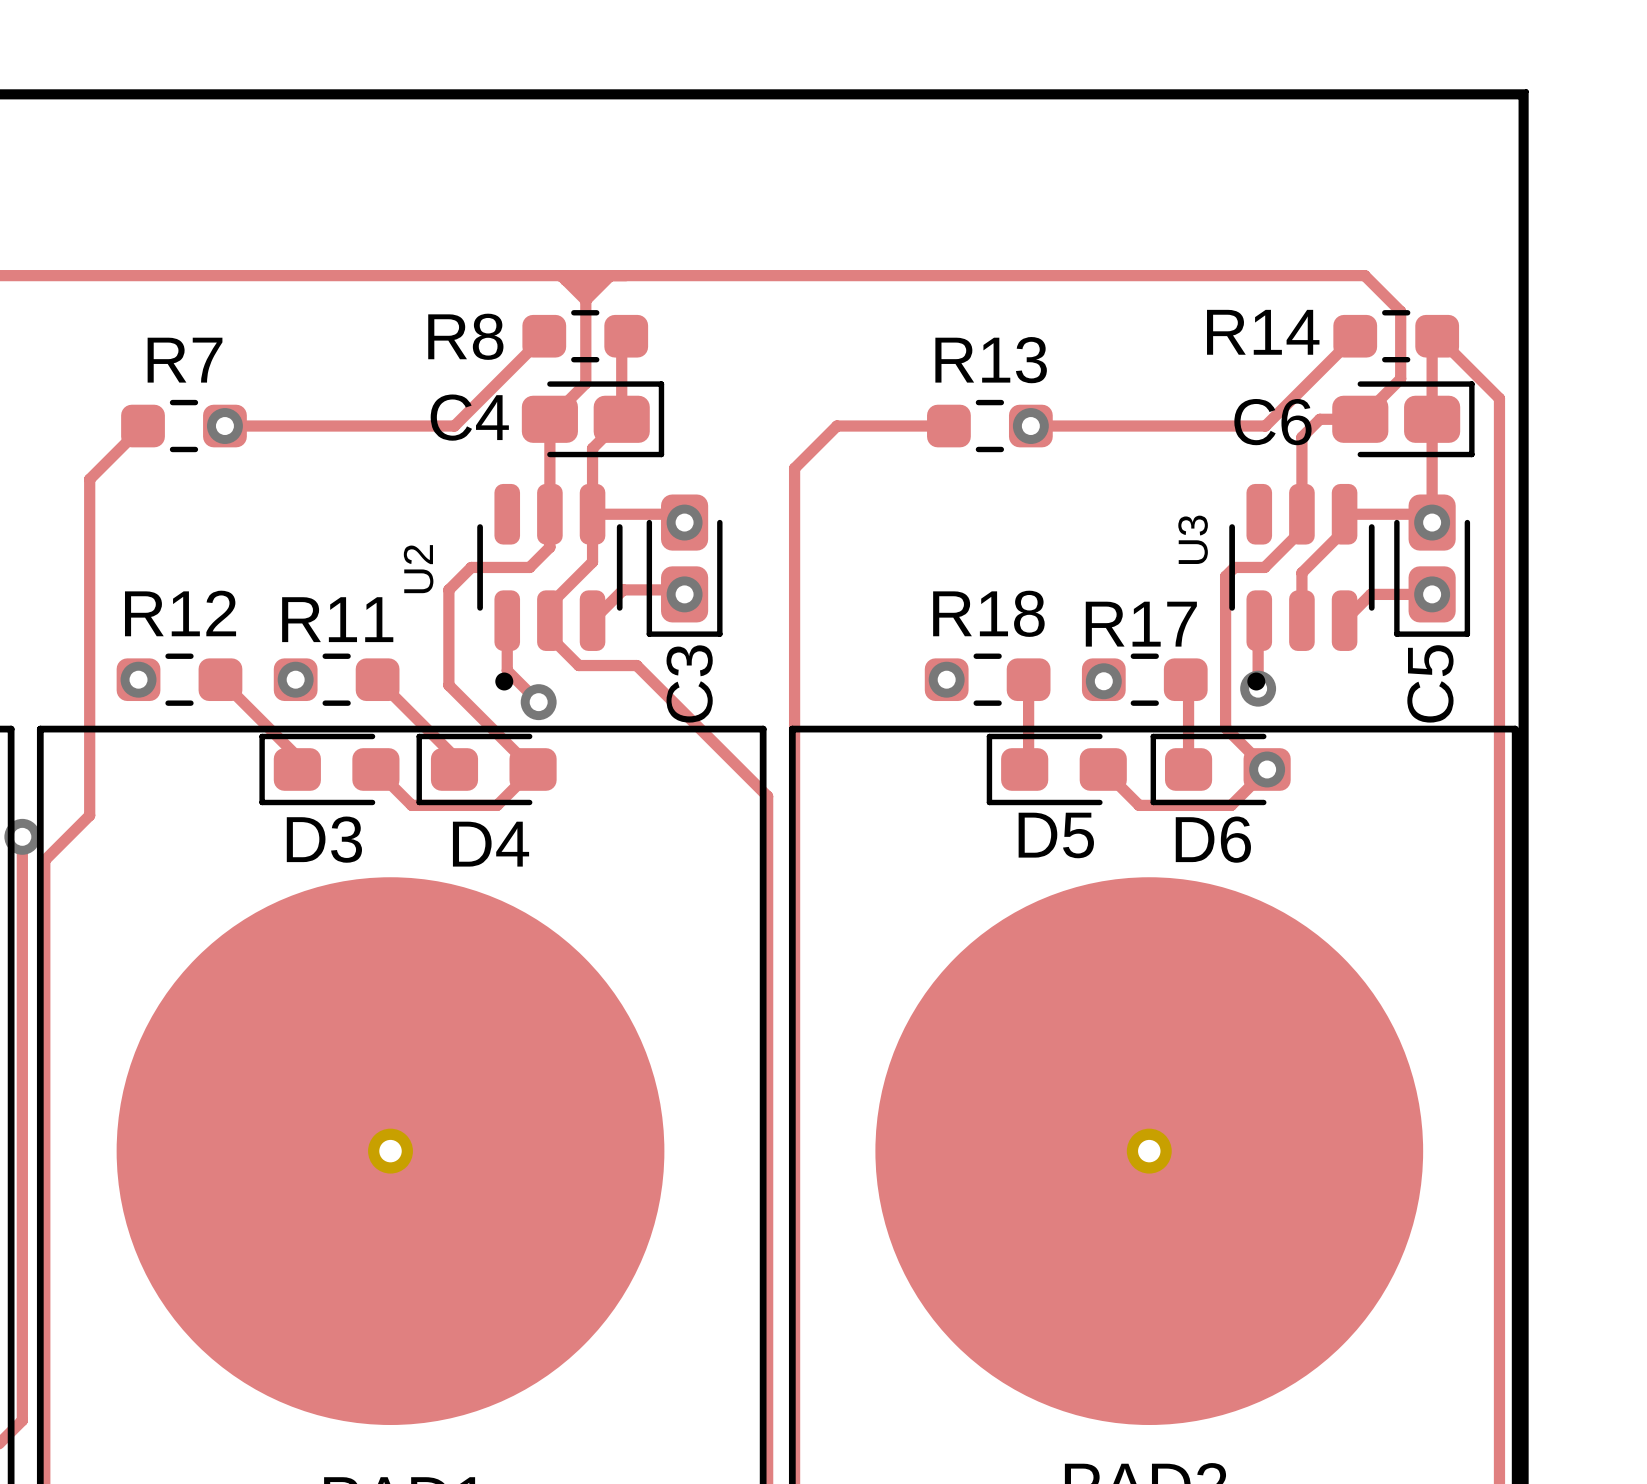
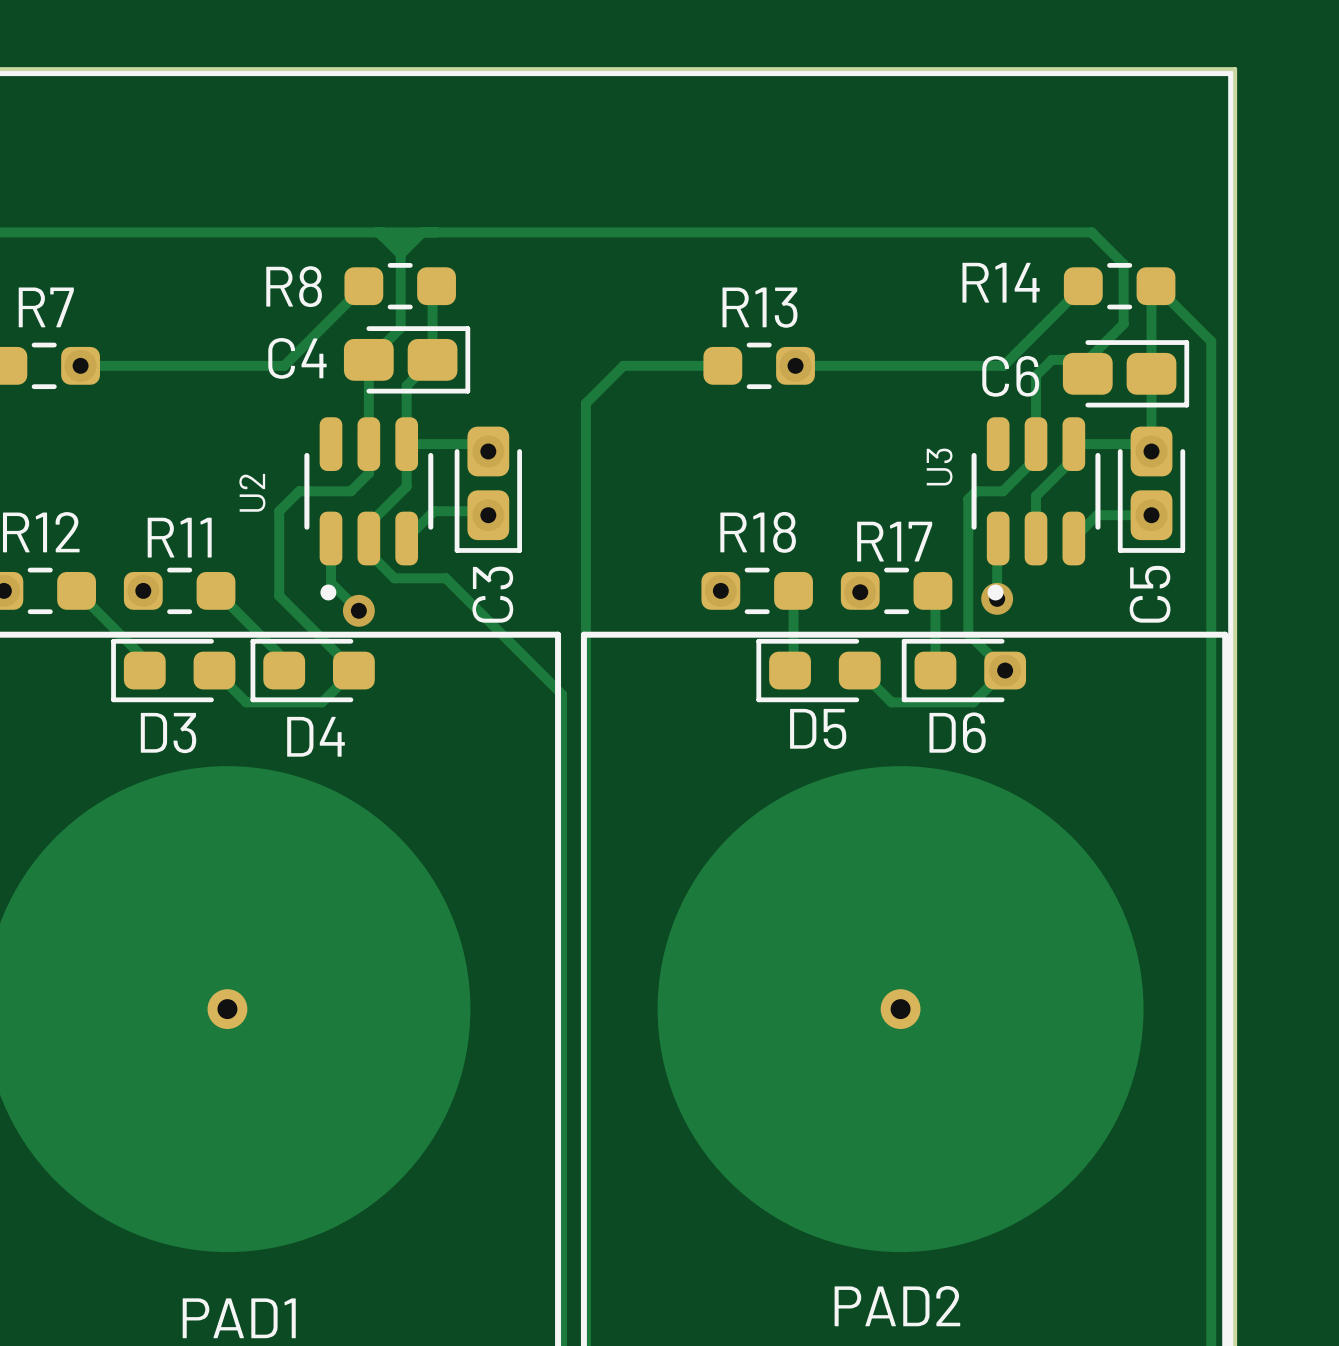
C6 position: (1403, 419) -> (1126, 373)

